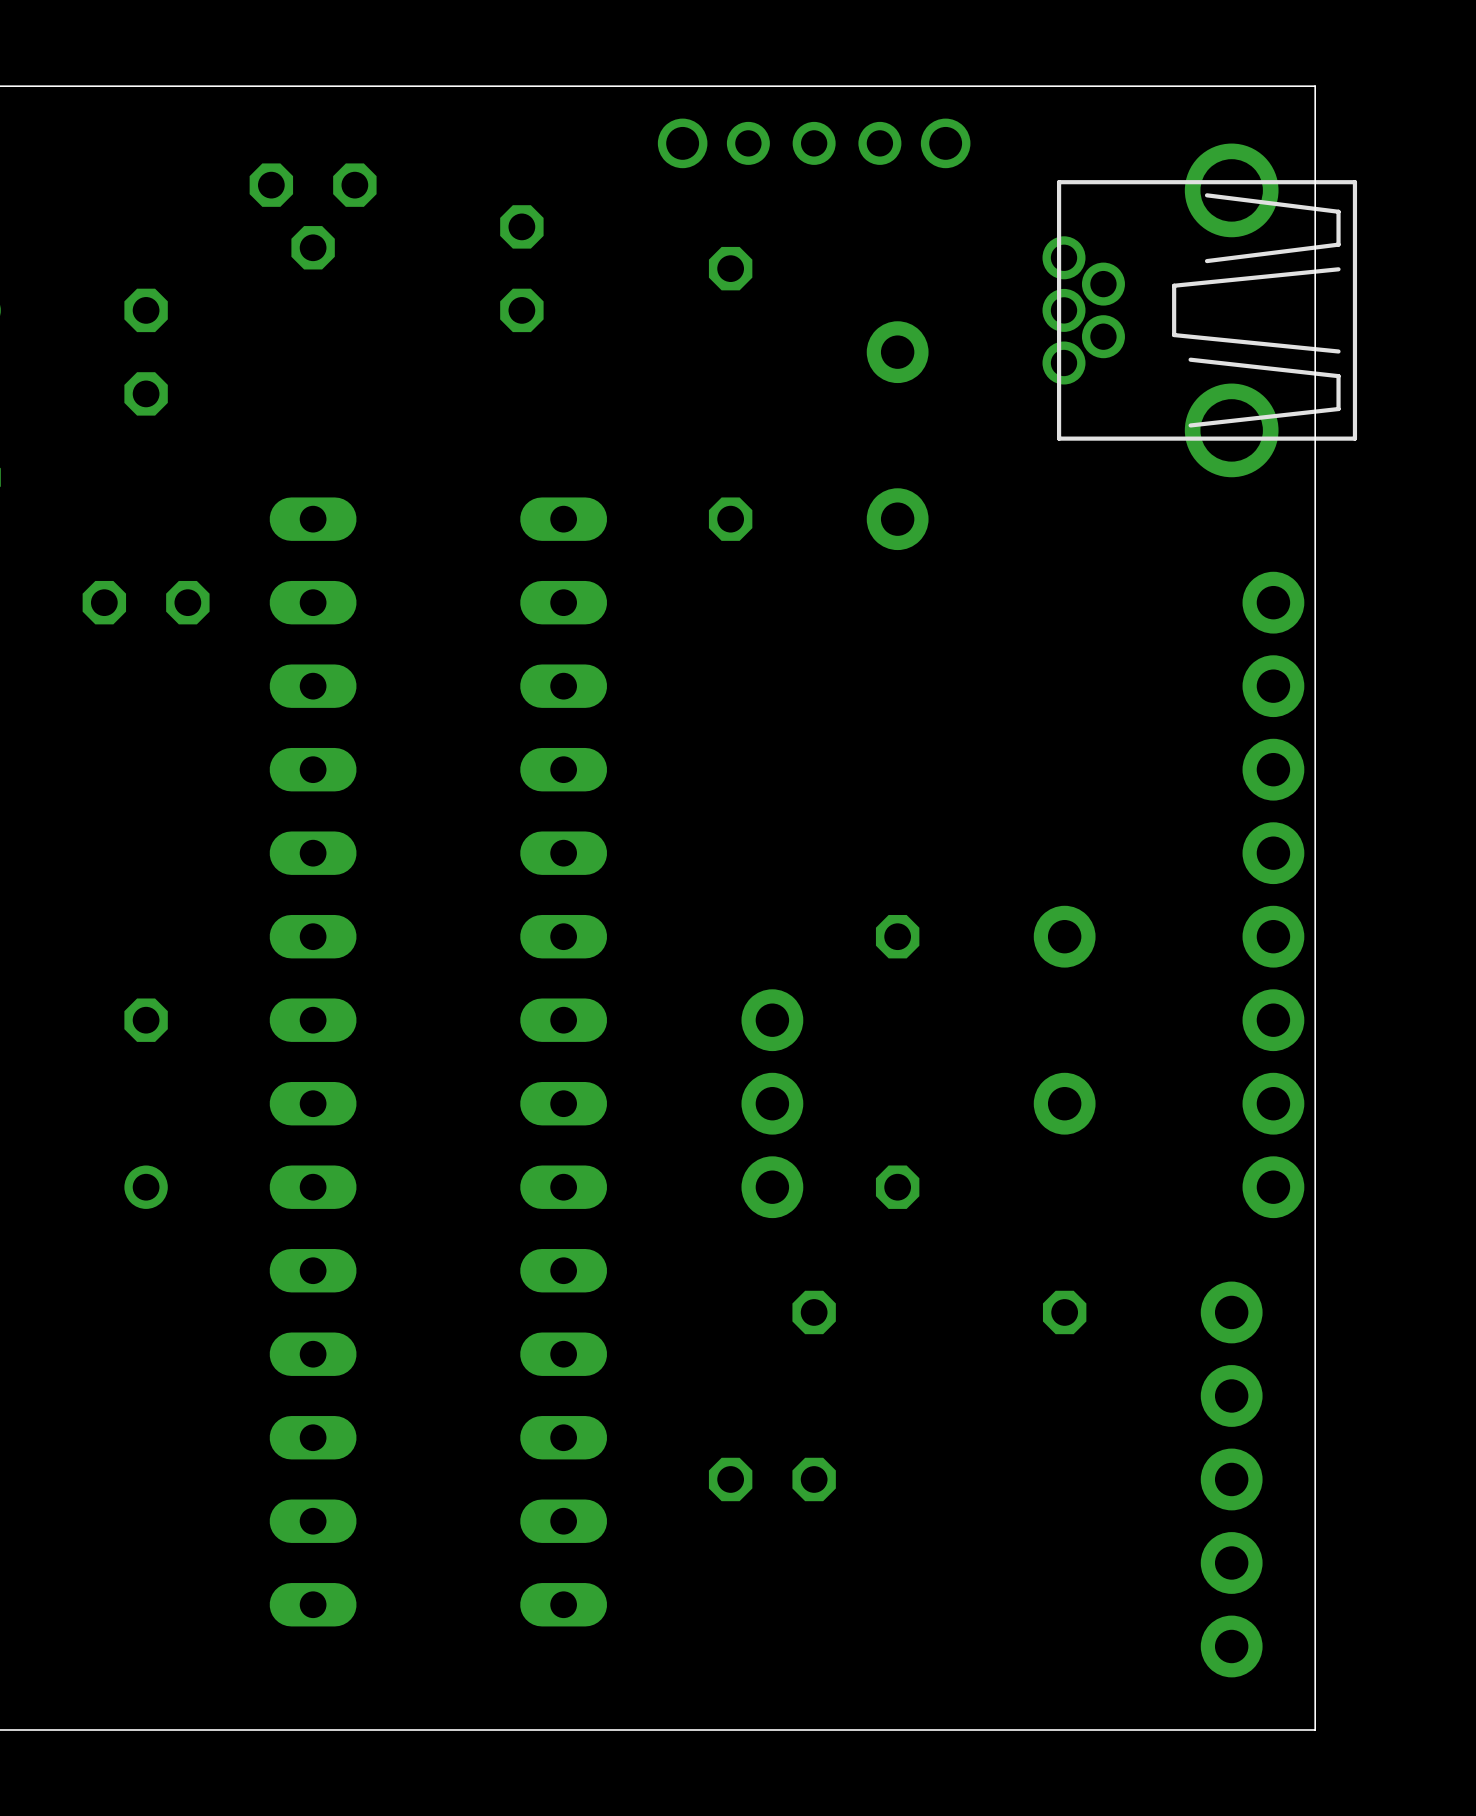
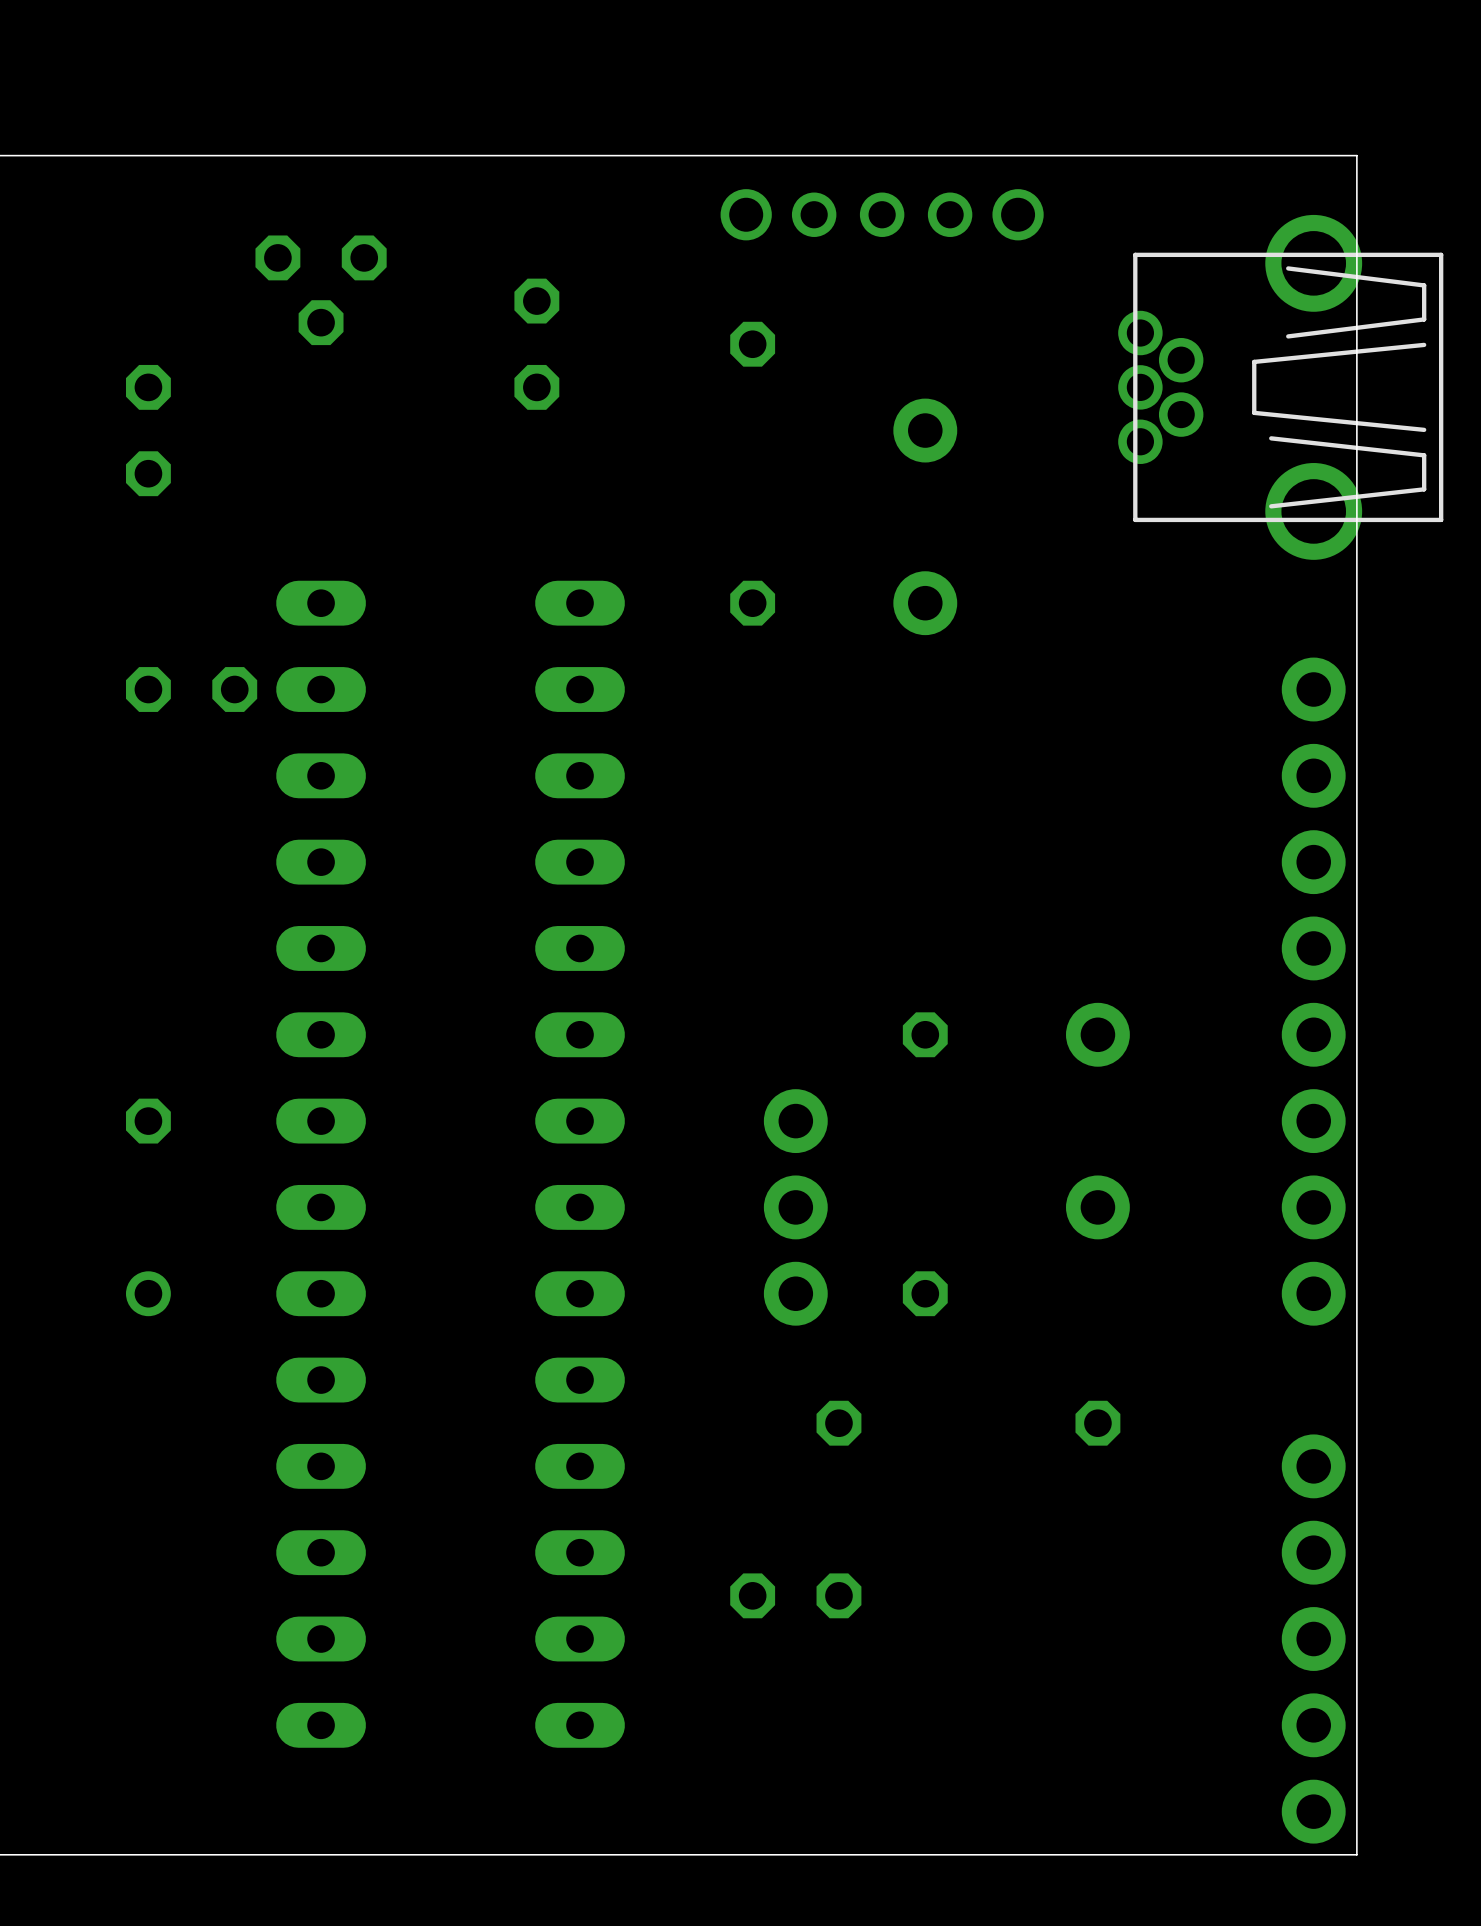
part position: (814, 143) -> (882, 214)
part position: (1199, 310) -> (1280, 387)
part position: (146, 602) -> (191, 689)
part position: (1231, 1479) -> (1313, 1639)

